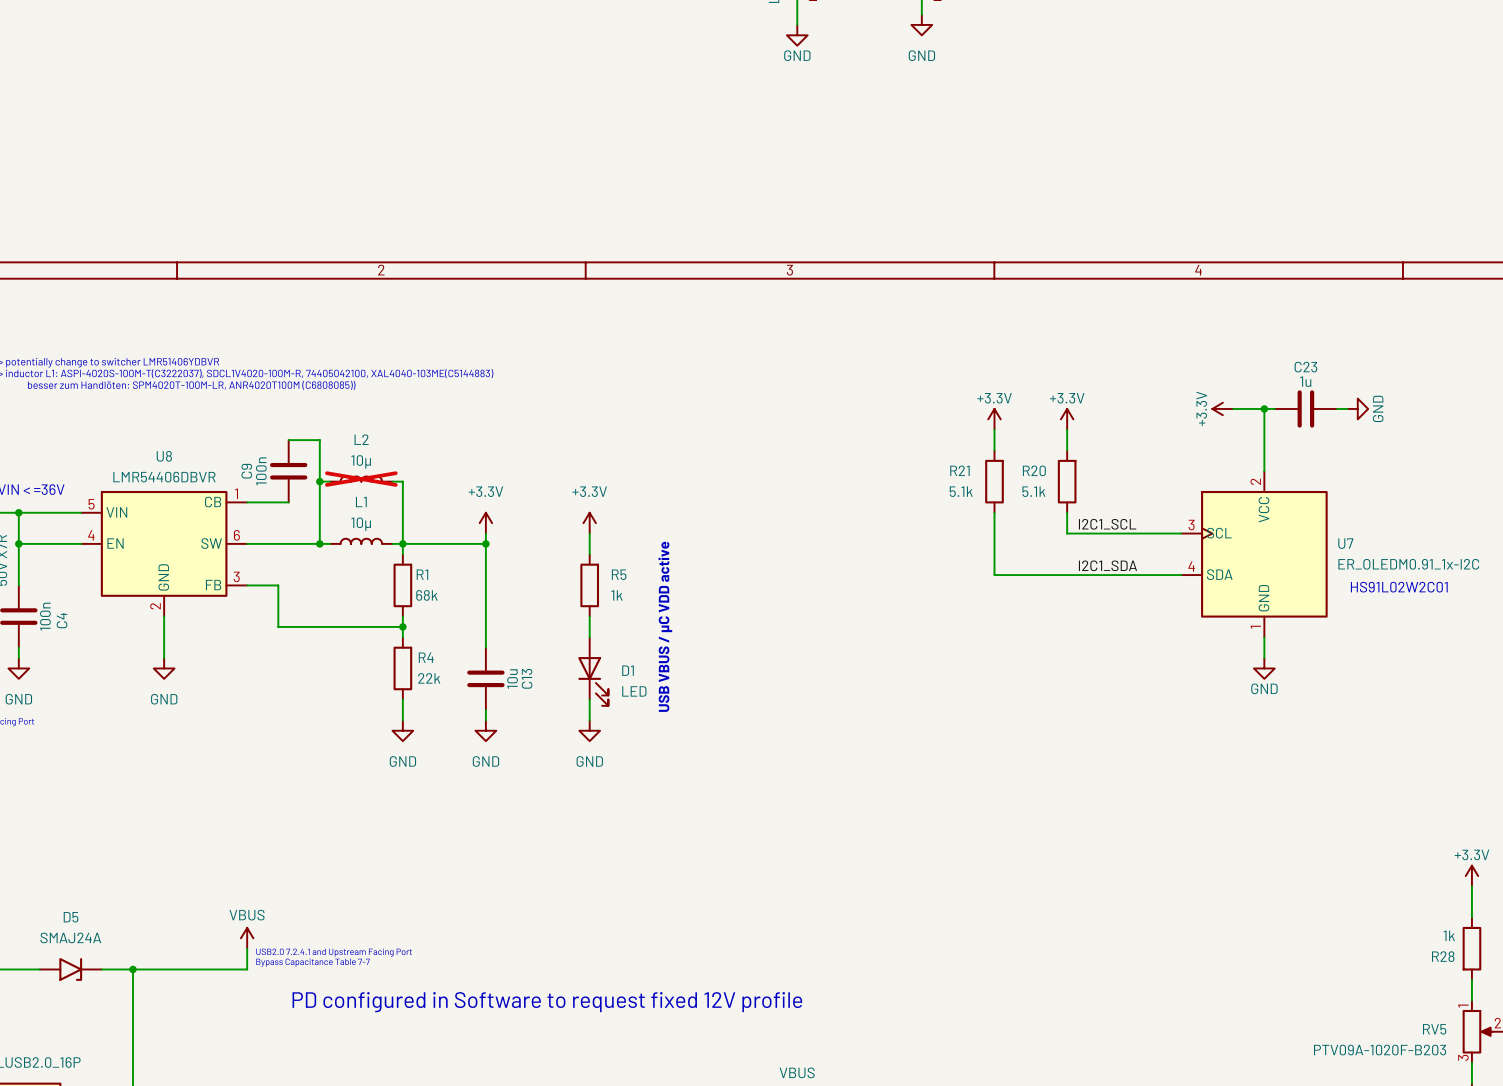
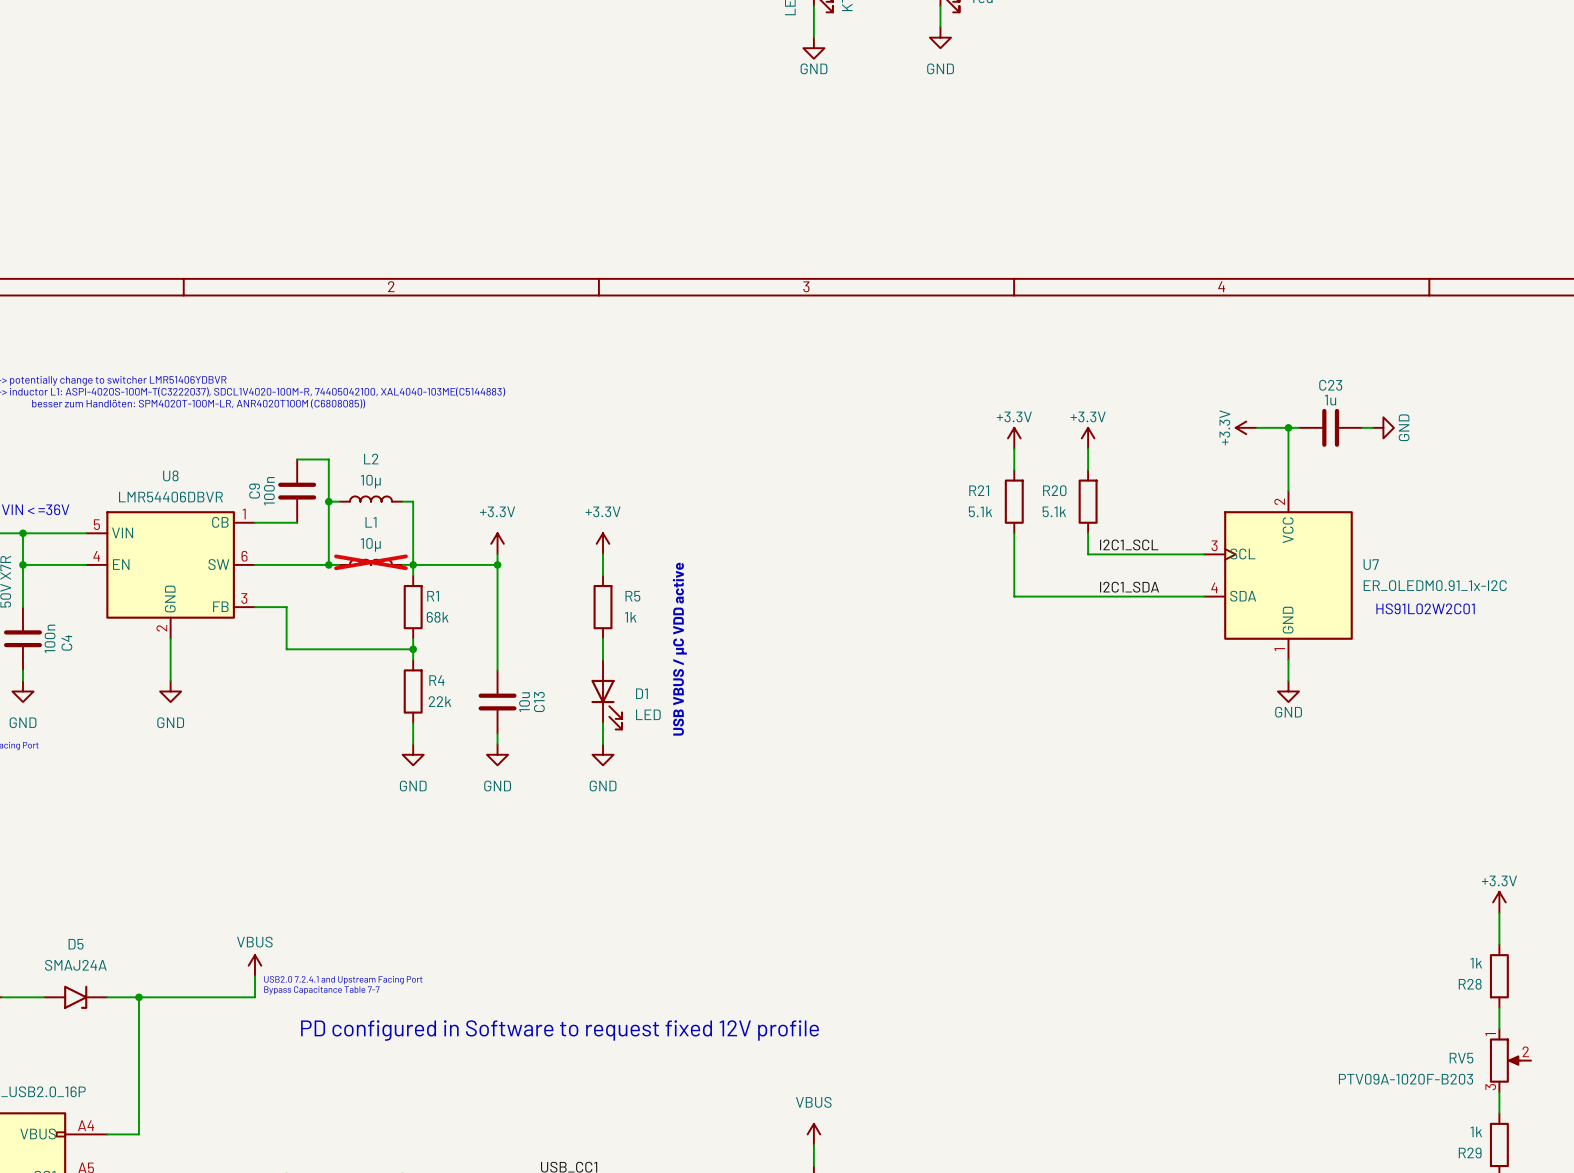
L2 do-not-place cross: (361, 479) -> none
L1 do-not-place cross: none -> (370, 562)

